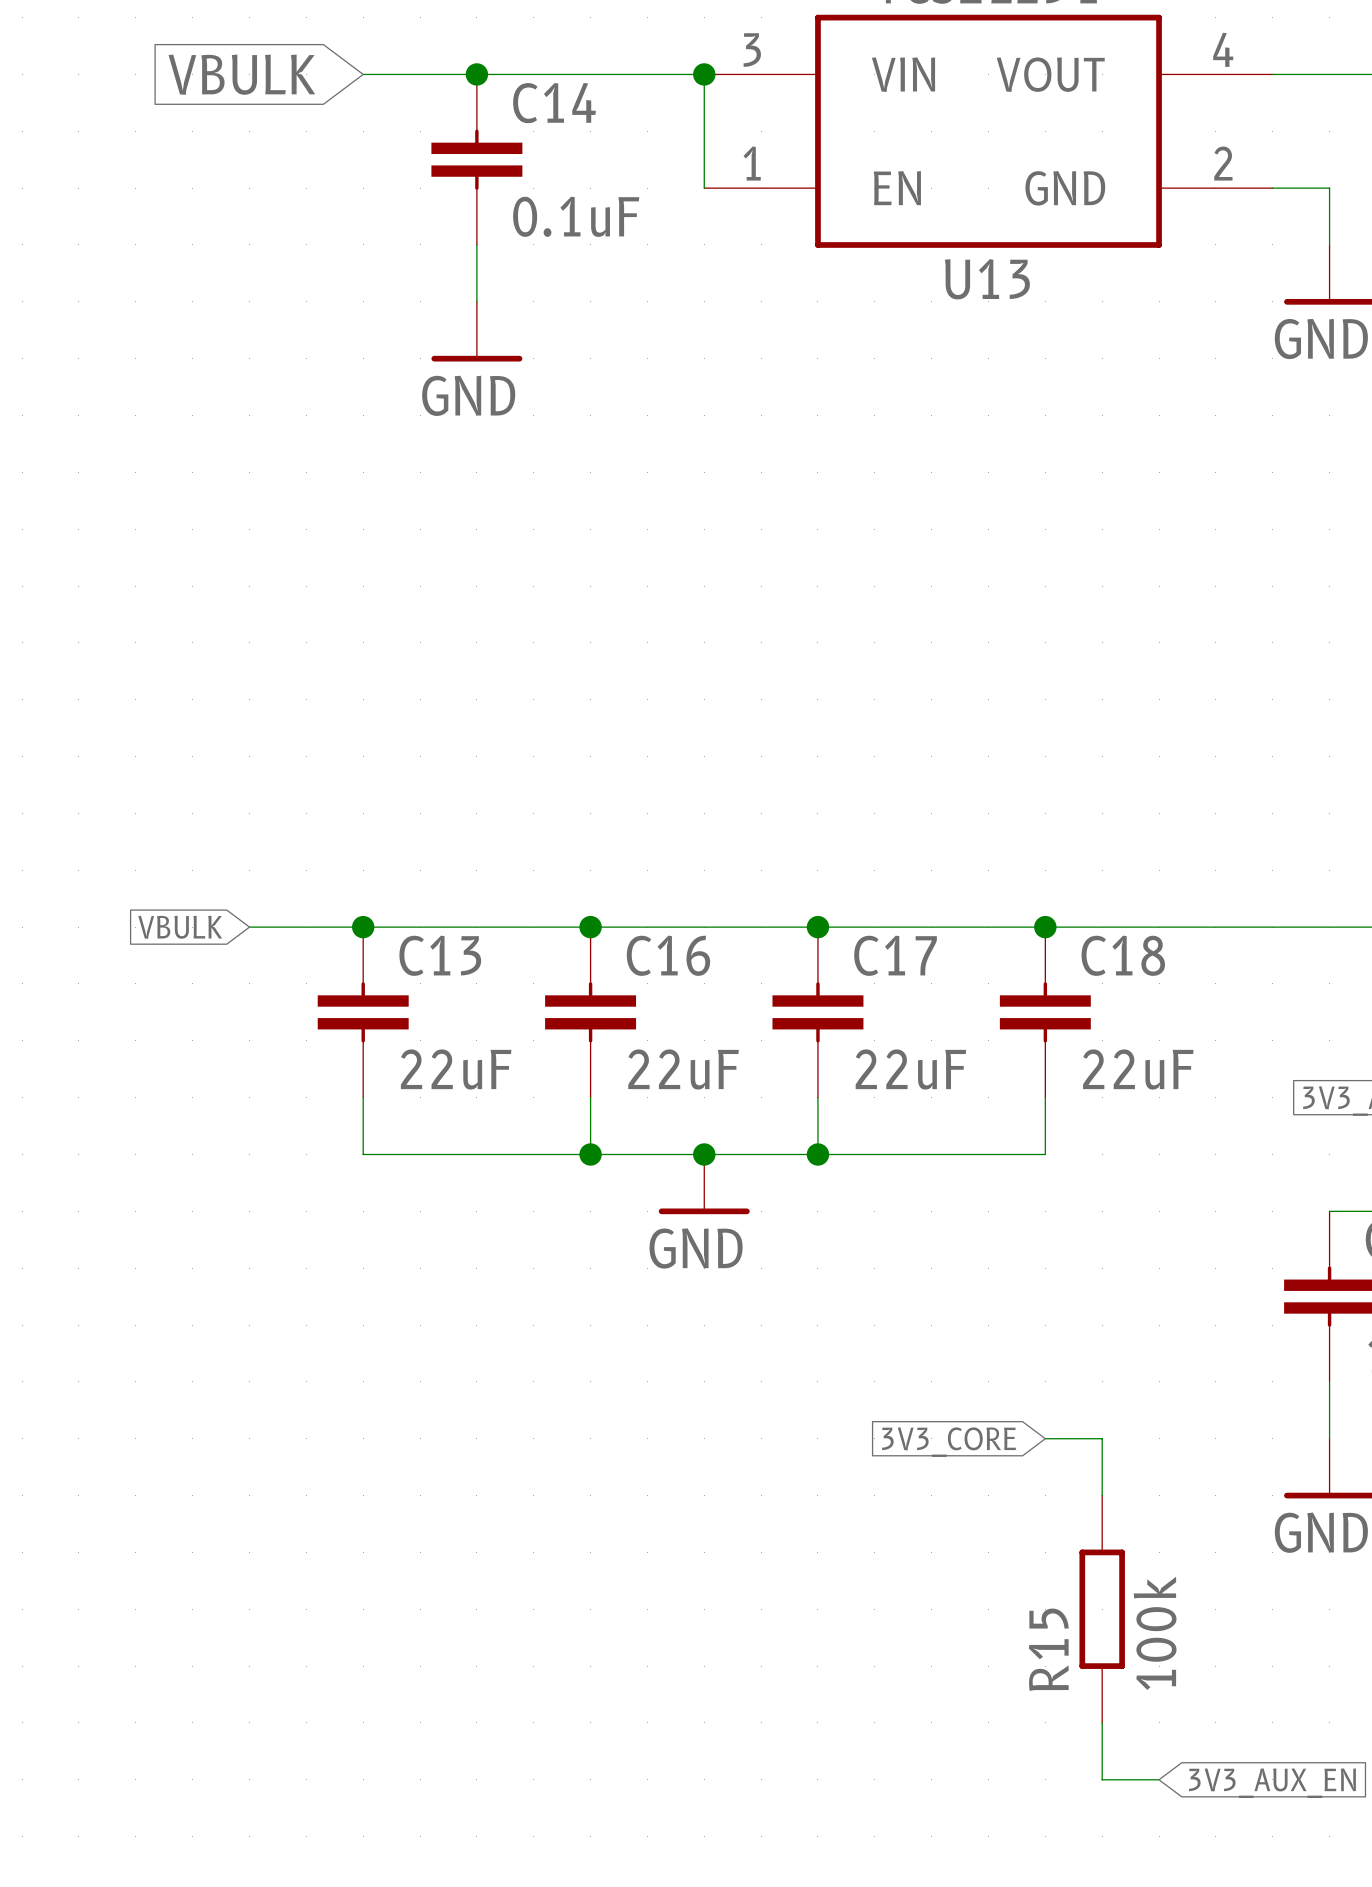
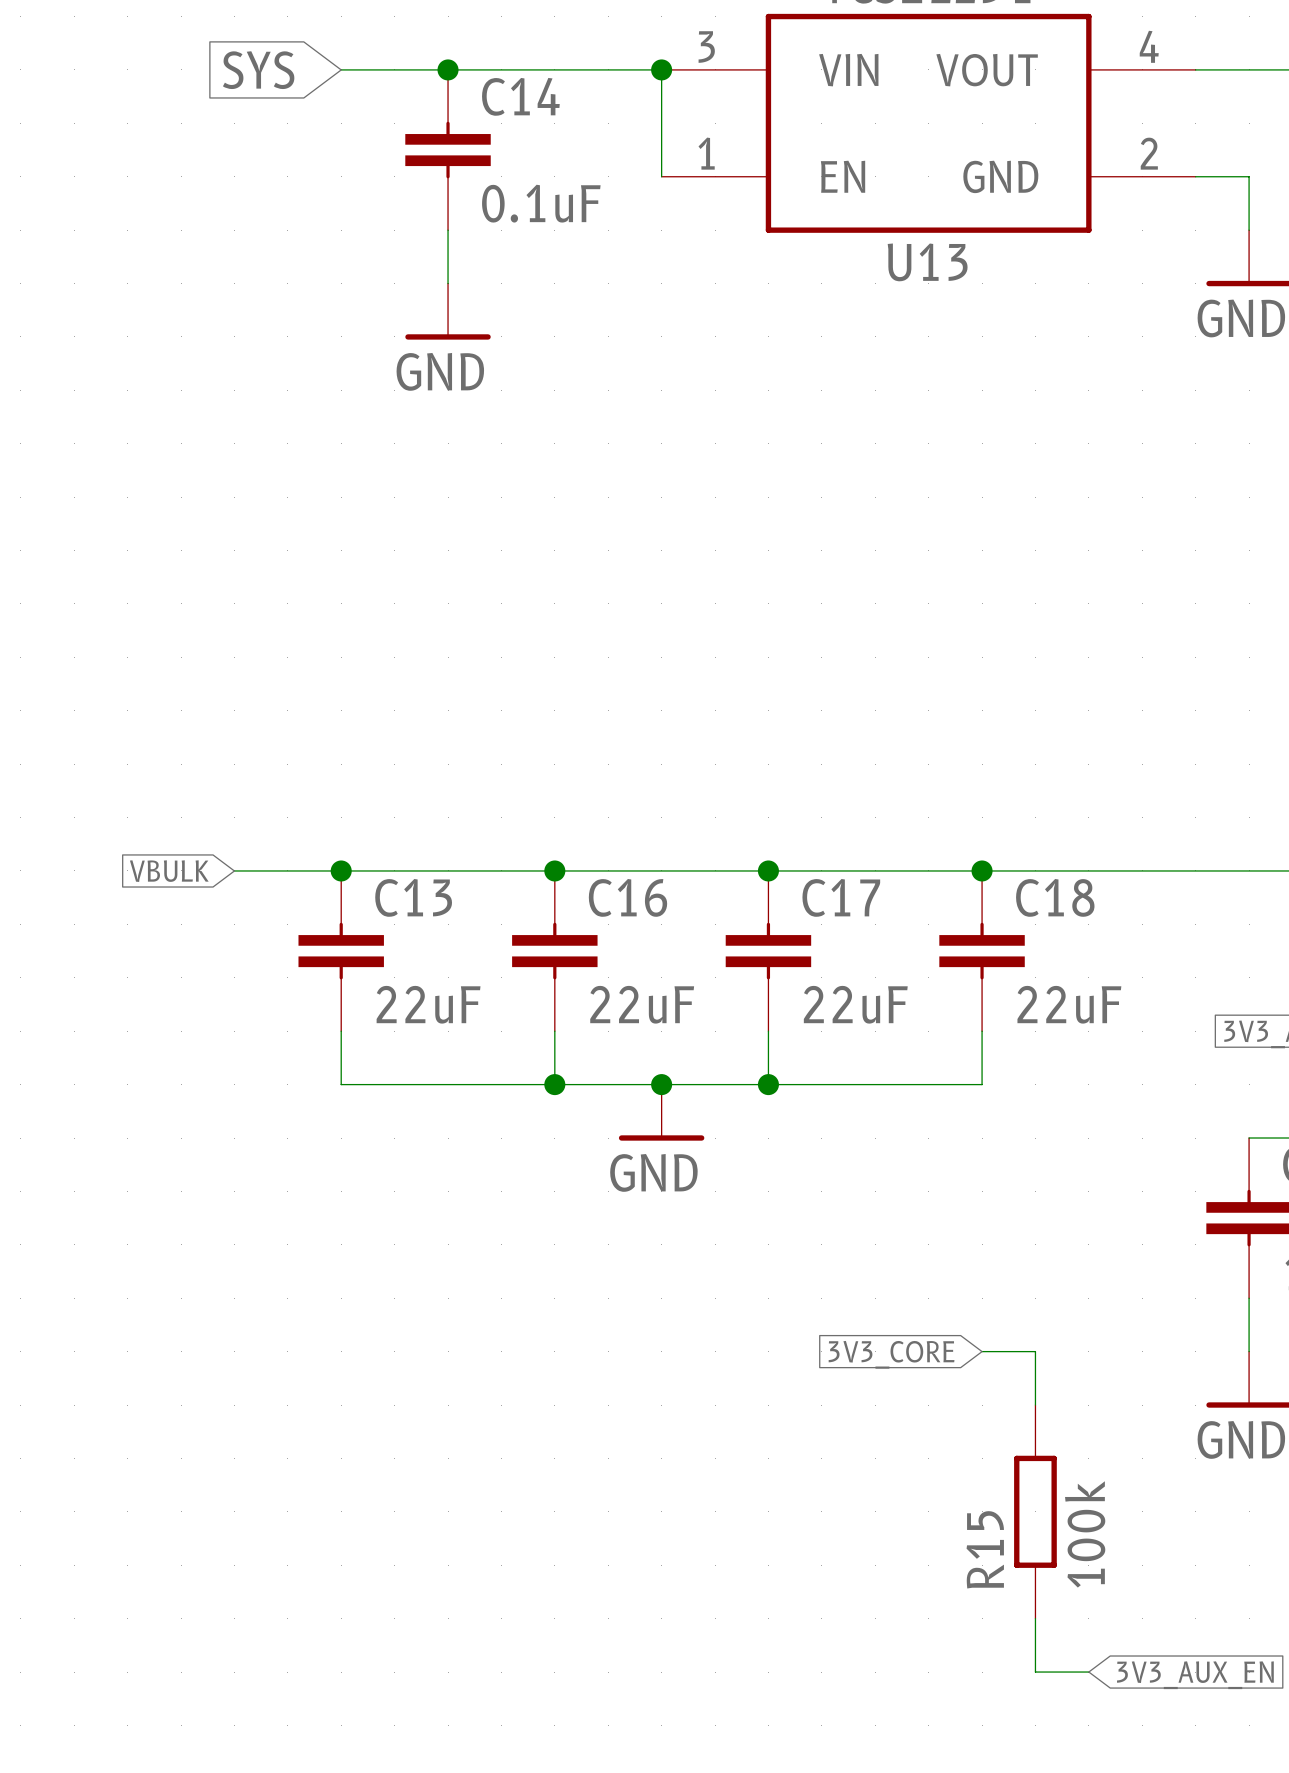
global label: VBULK (241, 74) -> SYS (258, 70)

